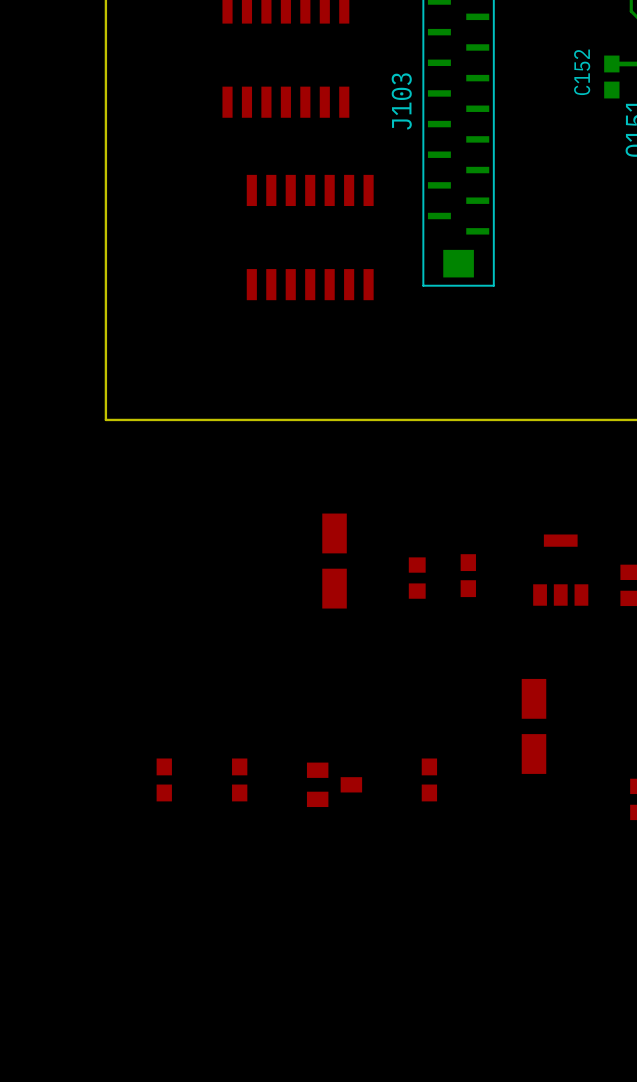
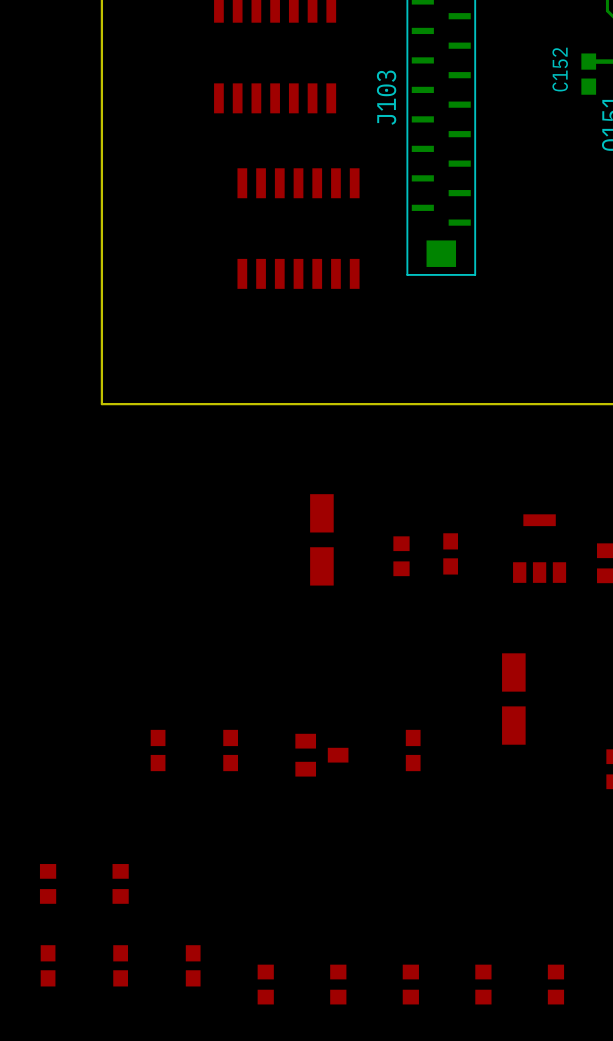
part: none -> (48, 883)
part: none -> (120, 883)
part: none -> (48, 965)
part: none -> (120, 965)
part: none -> (193, 965)
part: none -> (265, 984)
part: none -> (338, 984)
part: none -> (410, 984)
part: none -> (483, 984)
part: none -> (555, 984)

